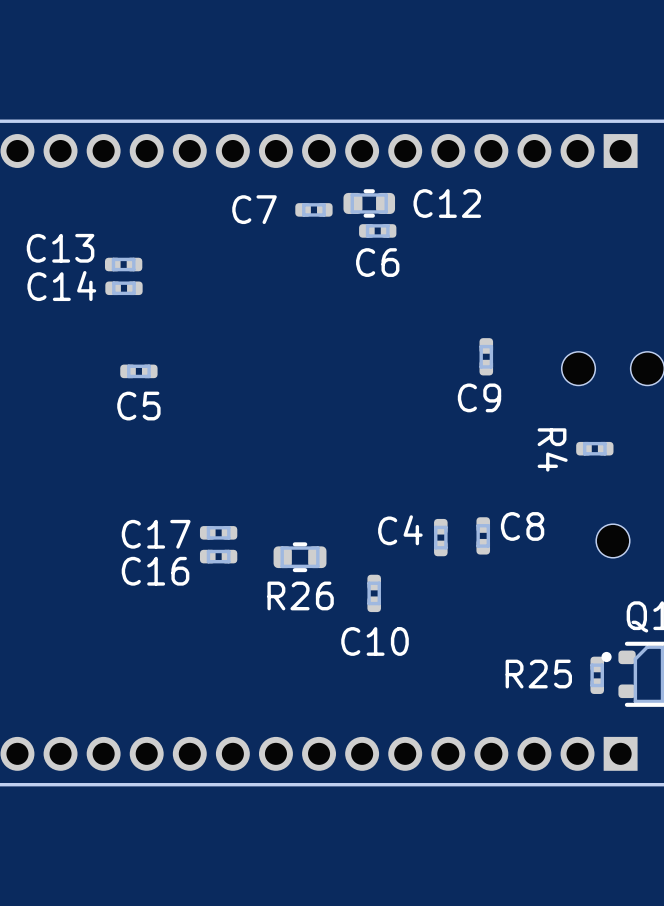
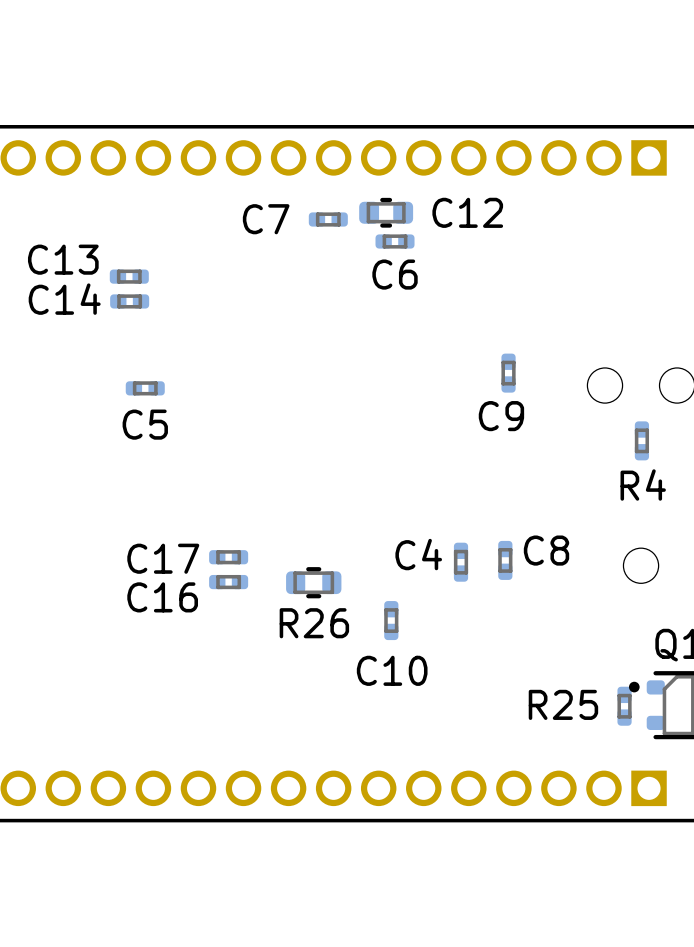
R4 rotation: 0° (594, 448) -> 90° clockwise (641, 440)
R4 position: (594, 448) -> (641, 440)

